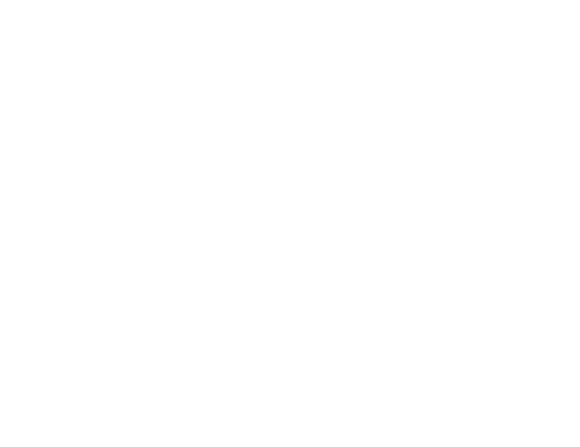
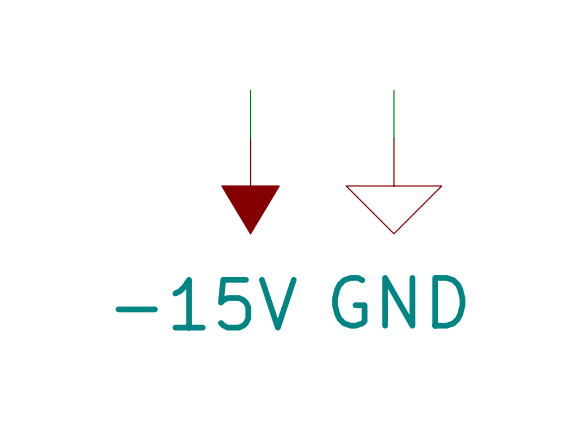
wire: none -> (250, 90) (250, 138)
wire: none -> (393, 90) (393, 138)
power symbol: none -> -15V (250, 185)
power symbol: none -> GND (393, 185)

